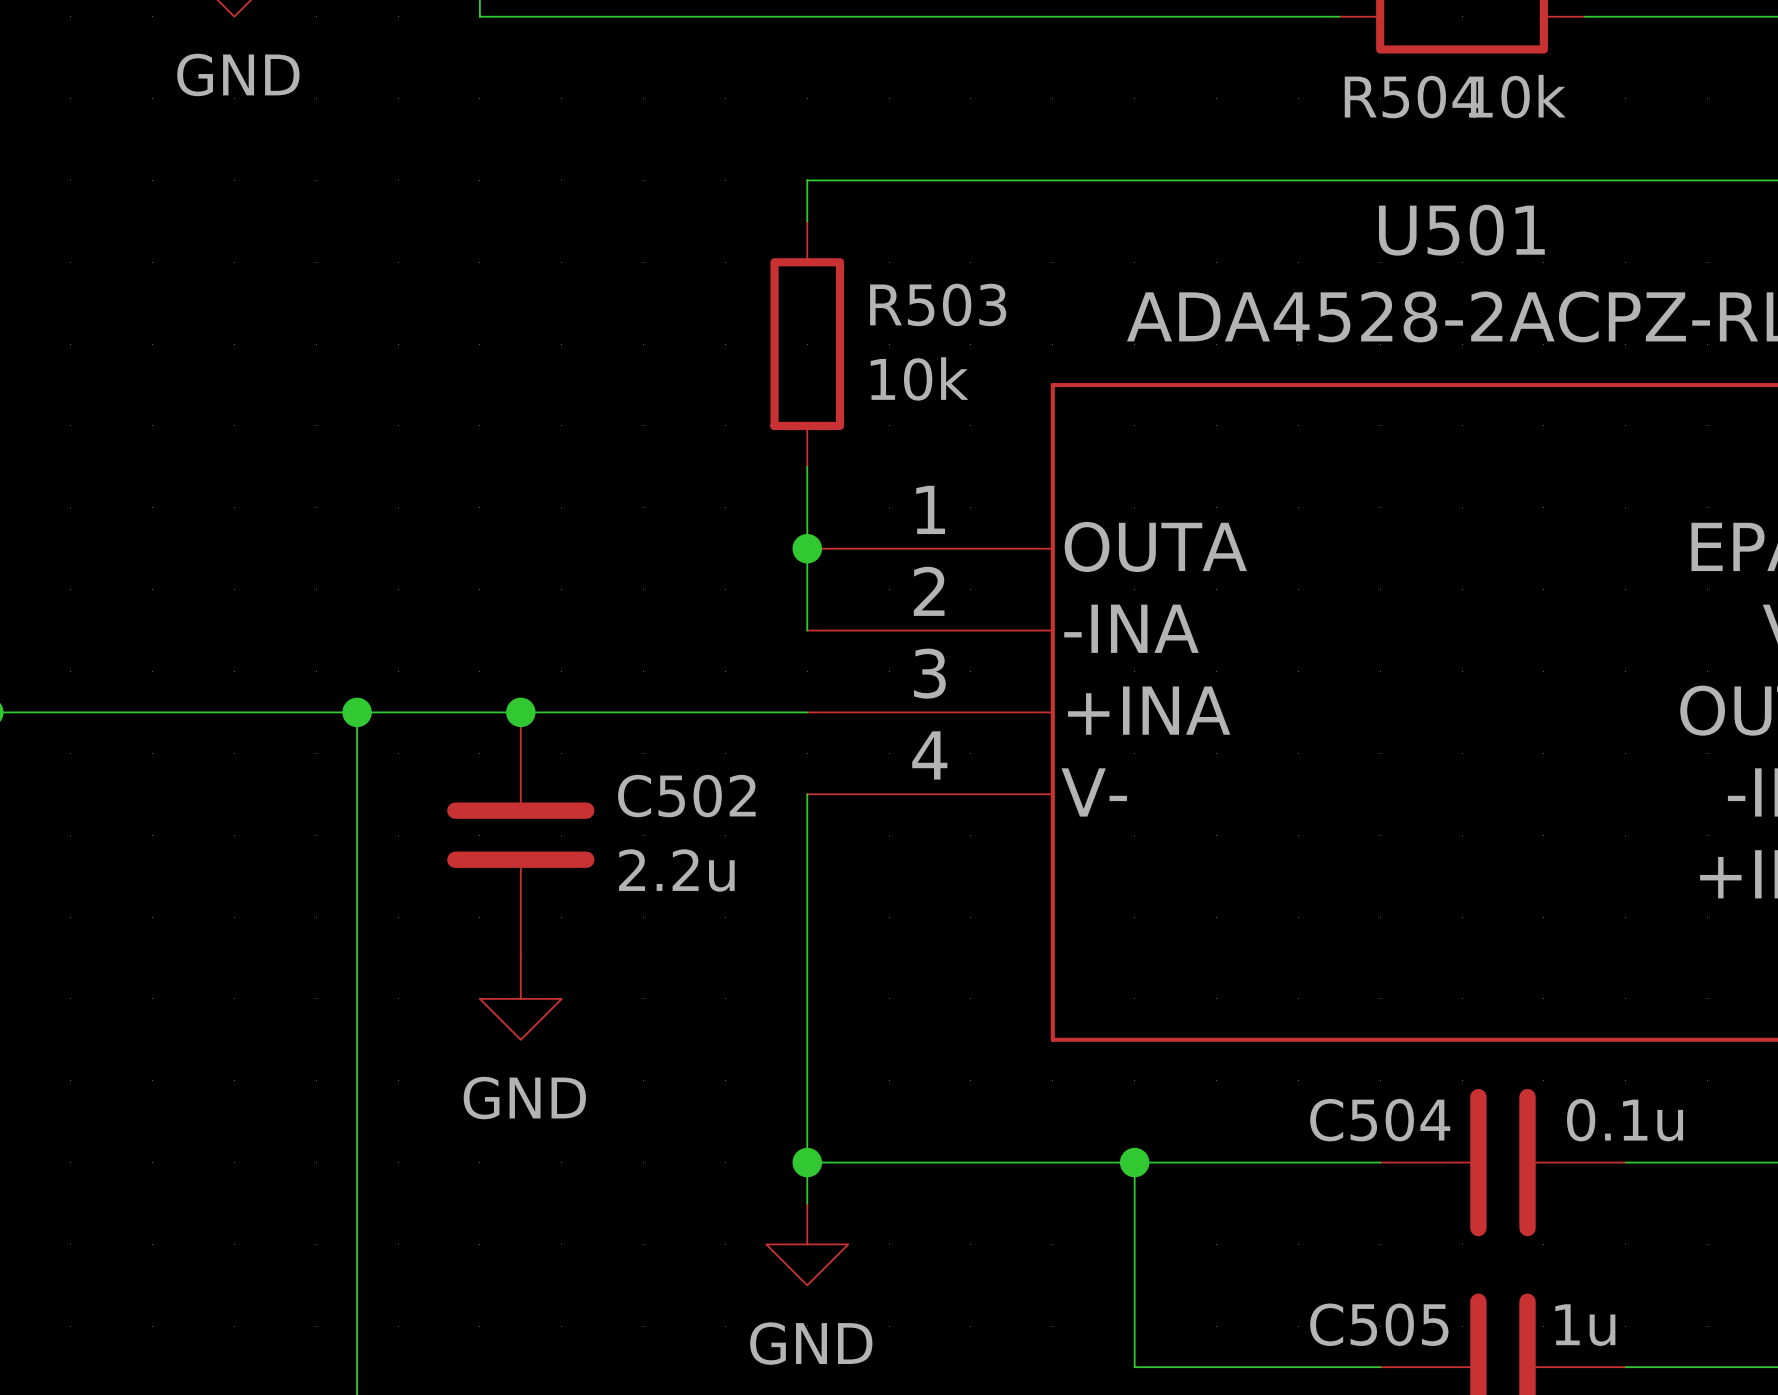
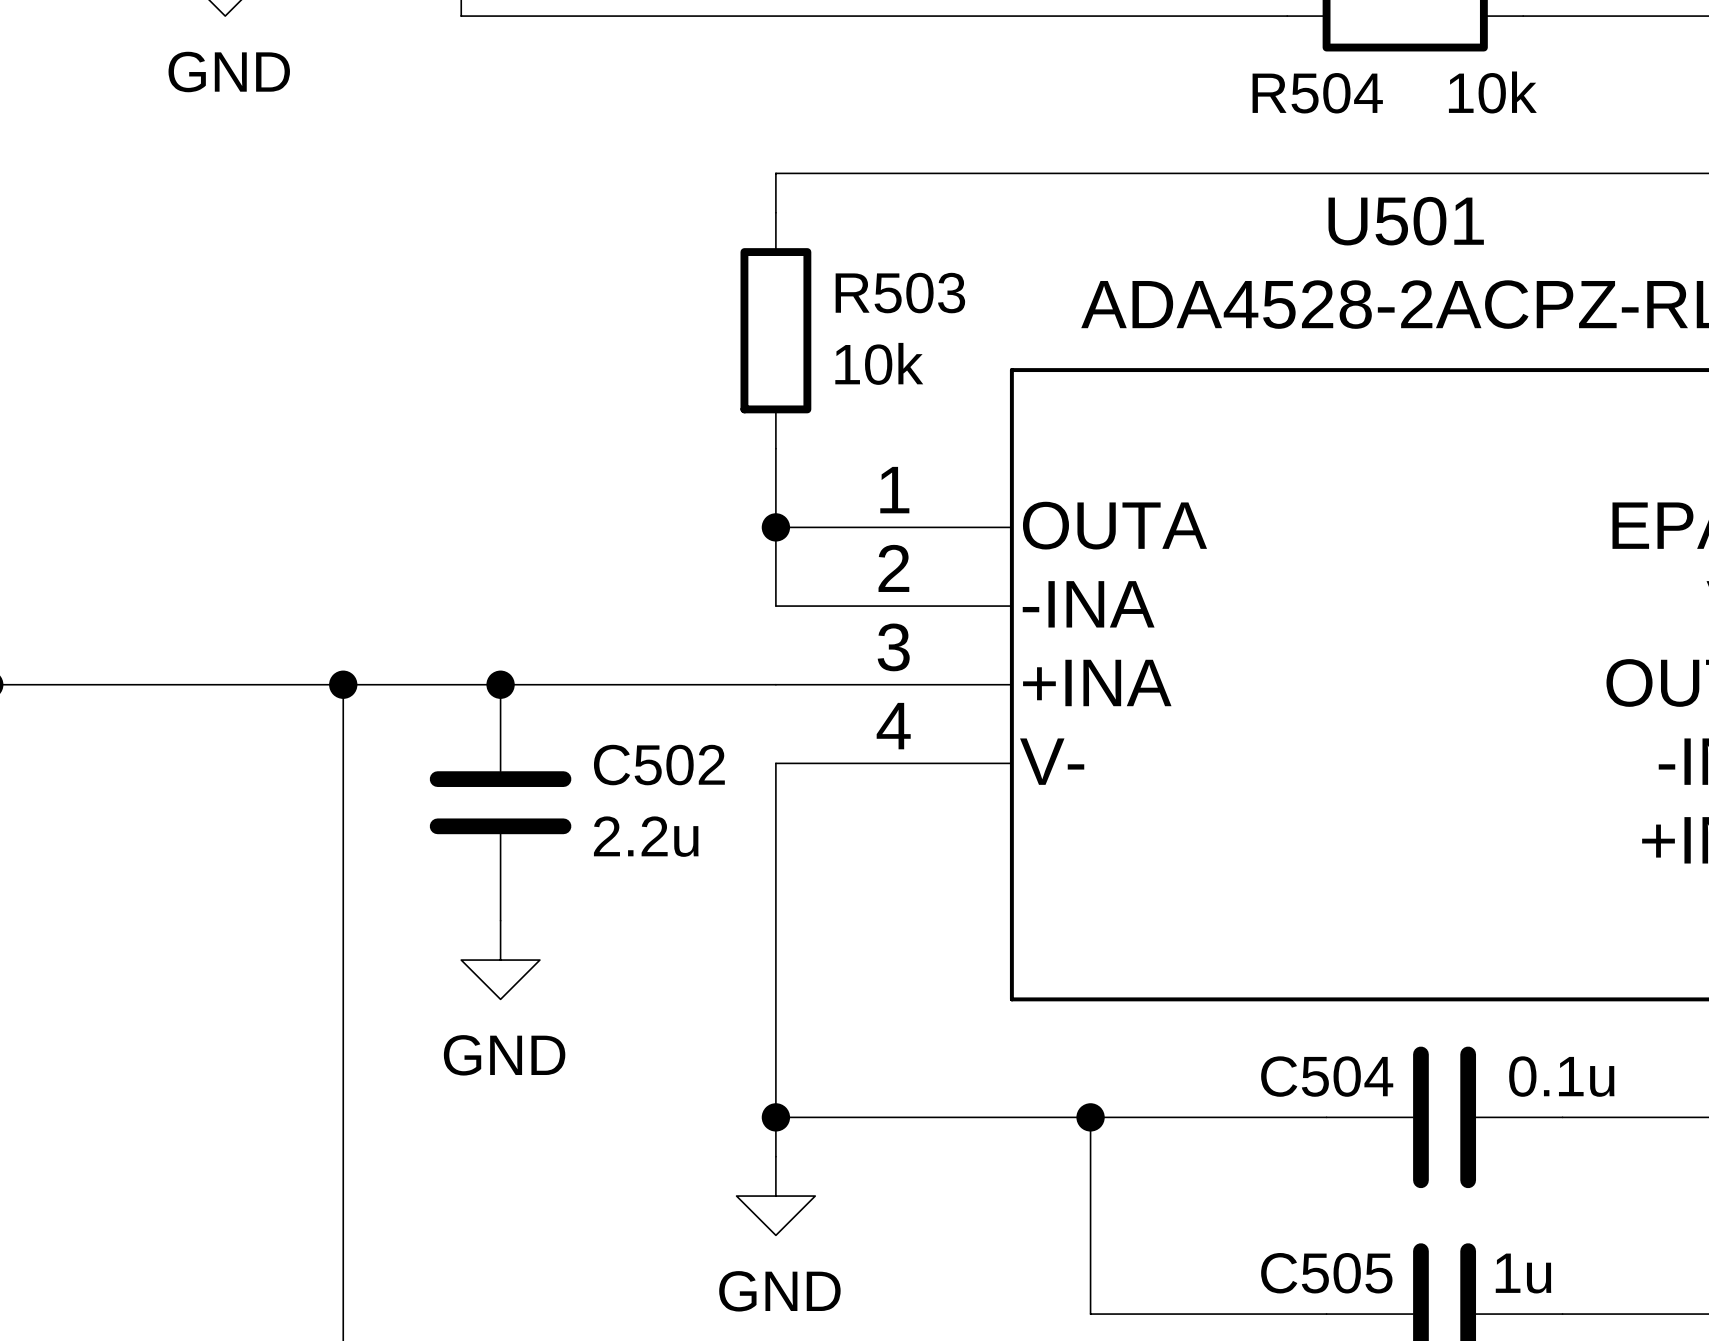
R504 value position: 10k (1517, 96) -> 10k (1492, 92)
R504 name position: R504 (1413, 97) -> R504 (1317, 93)

